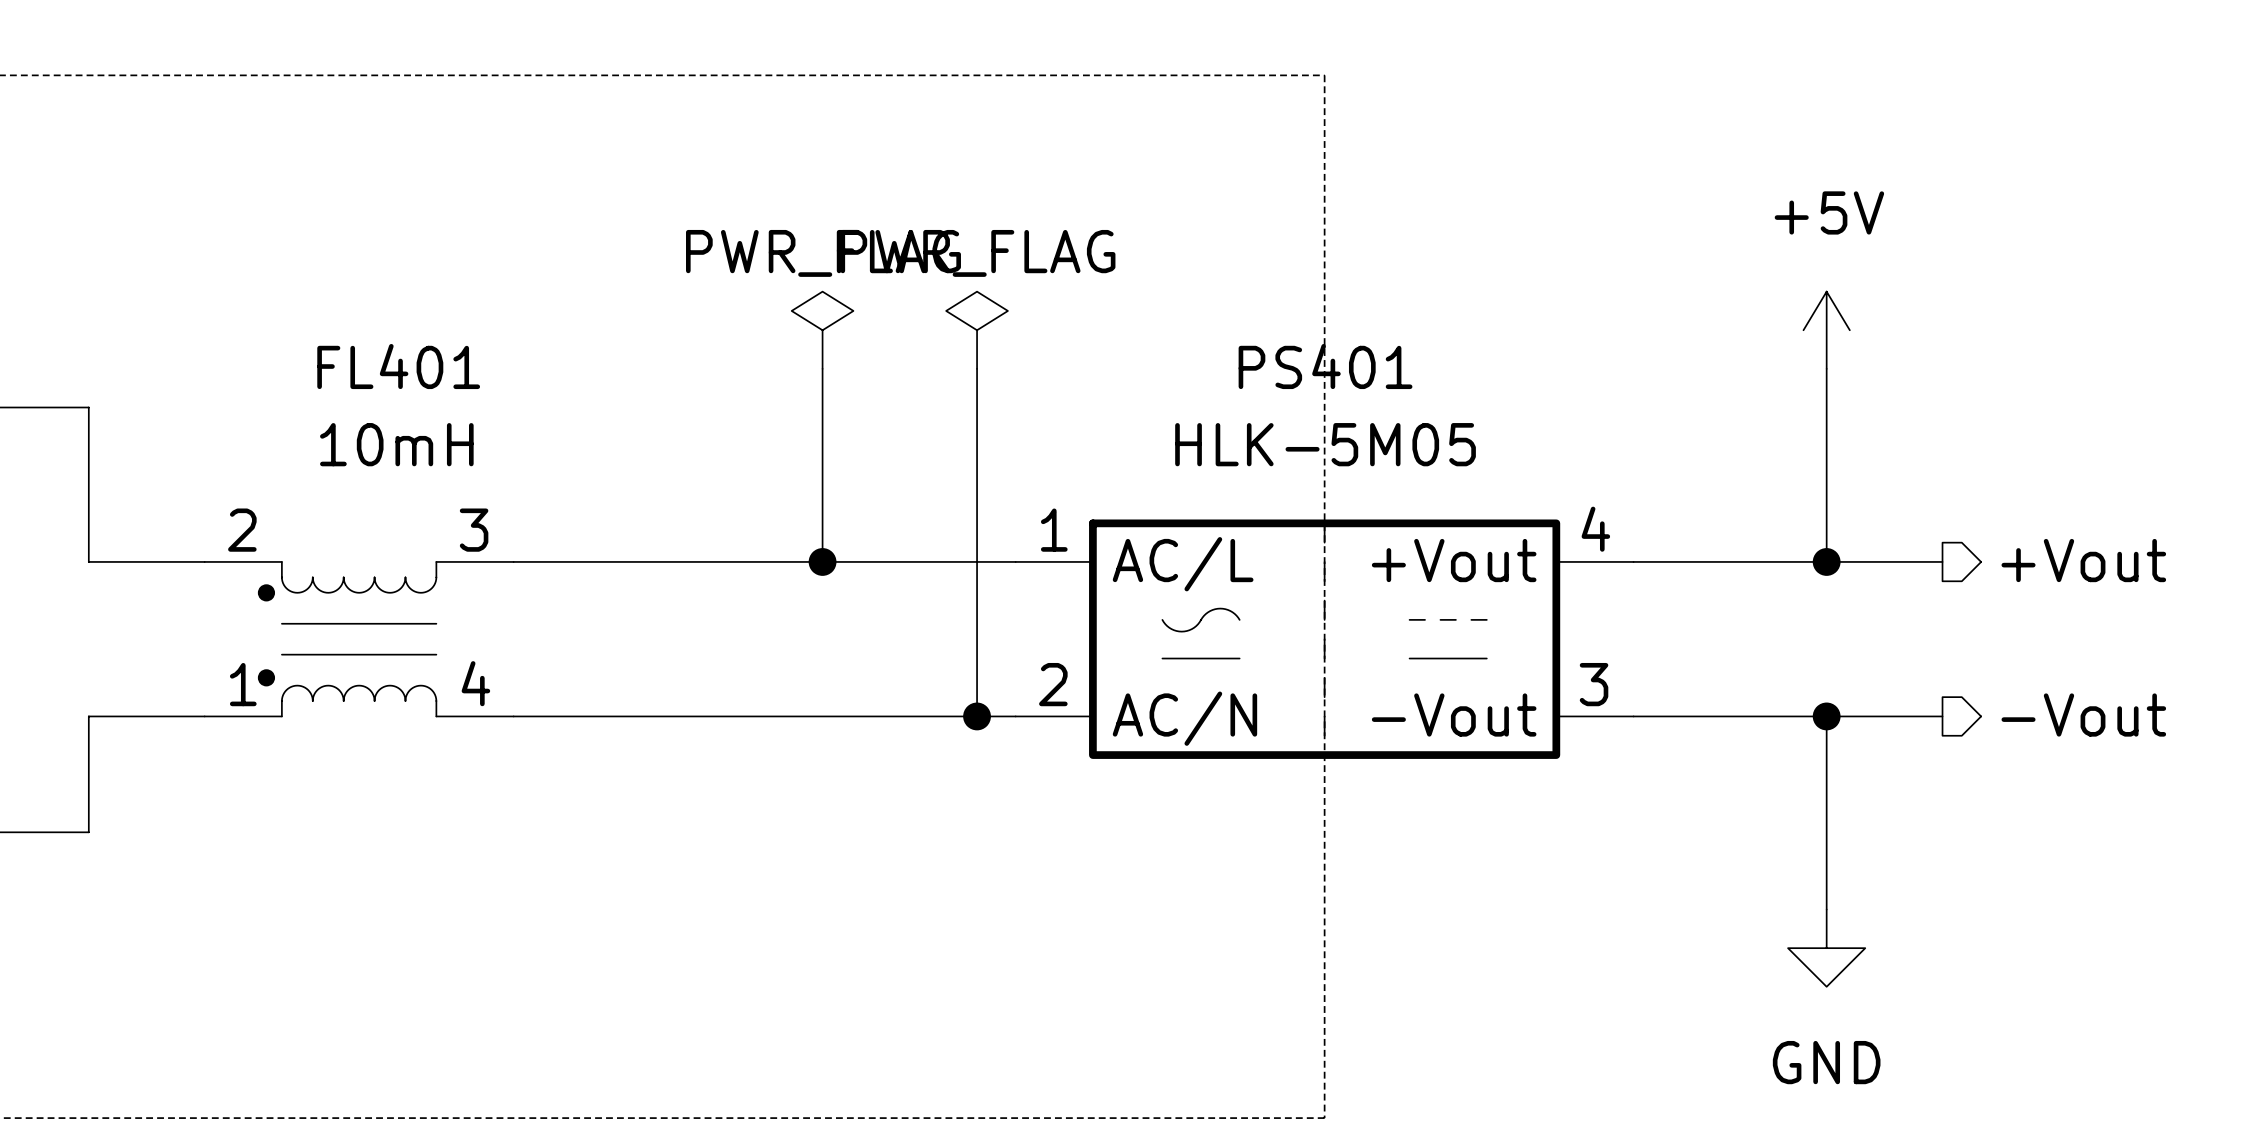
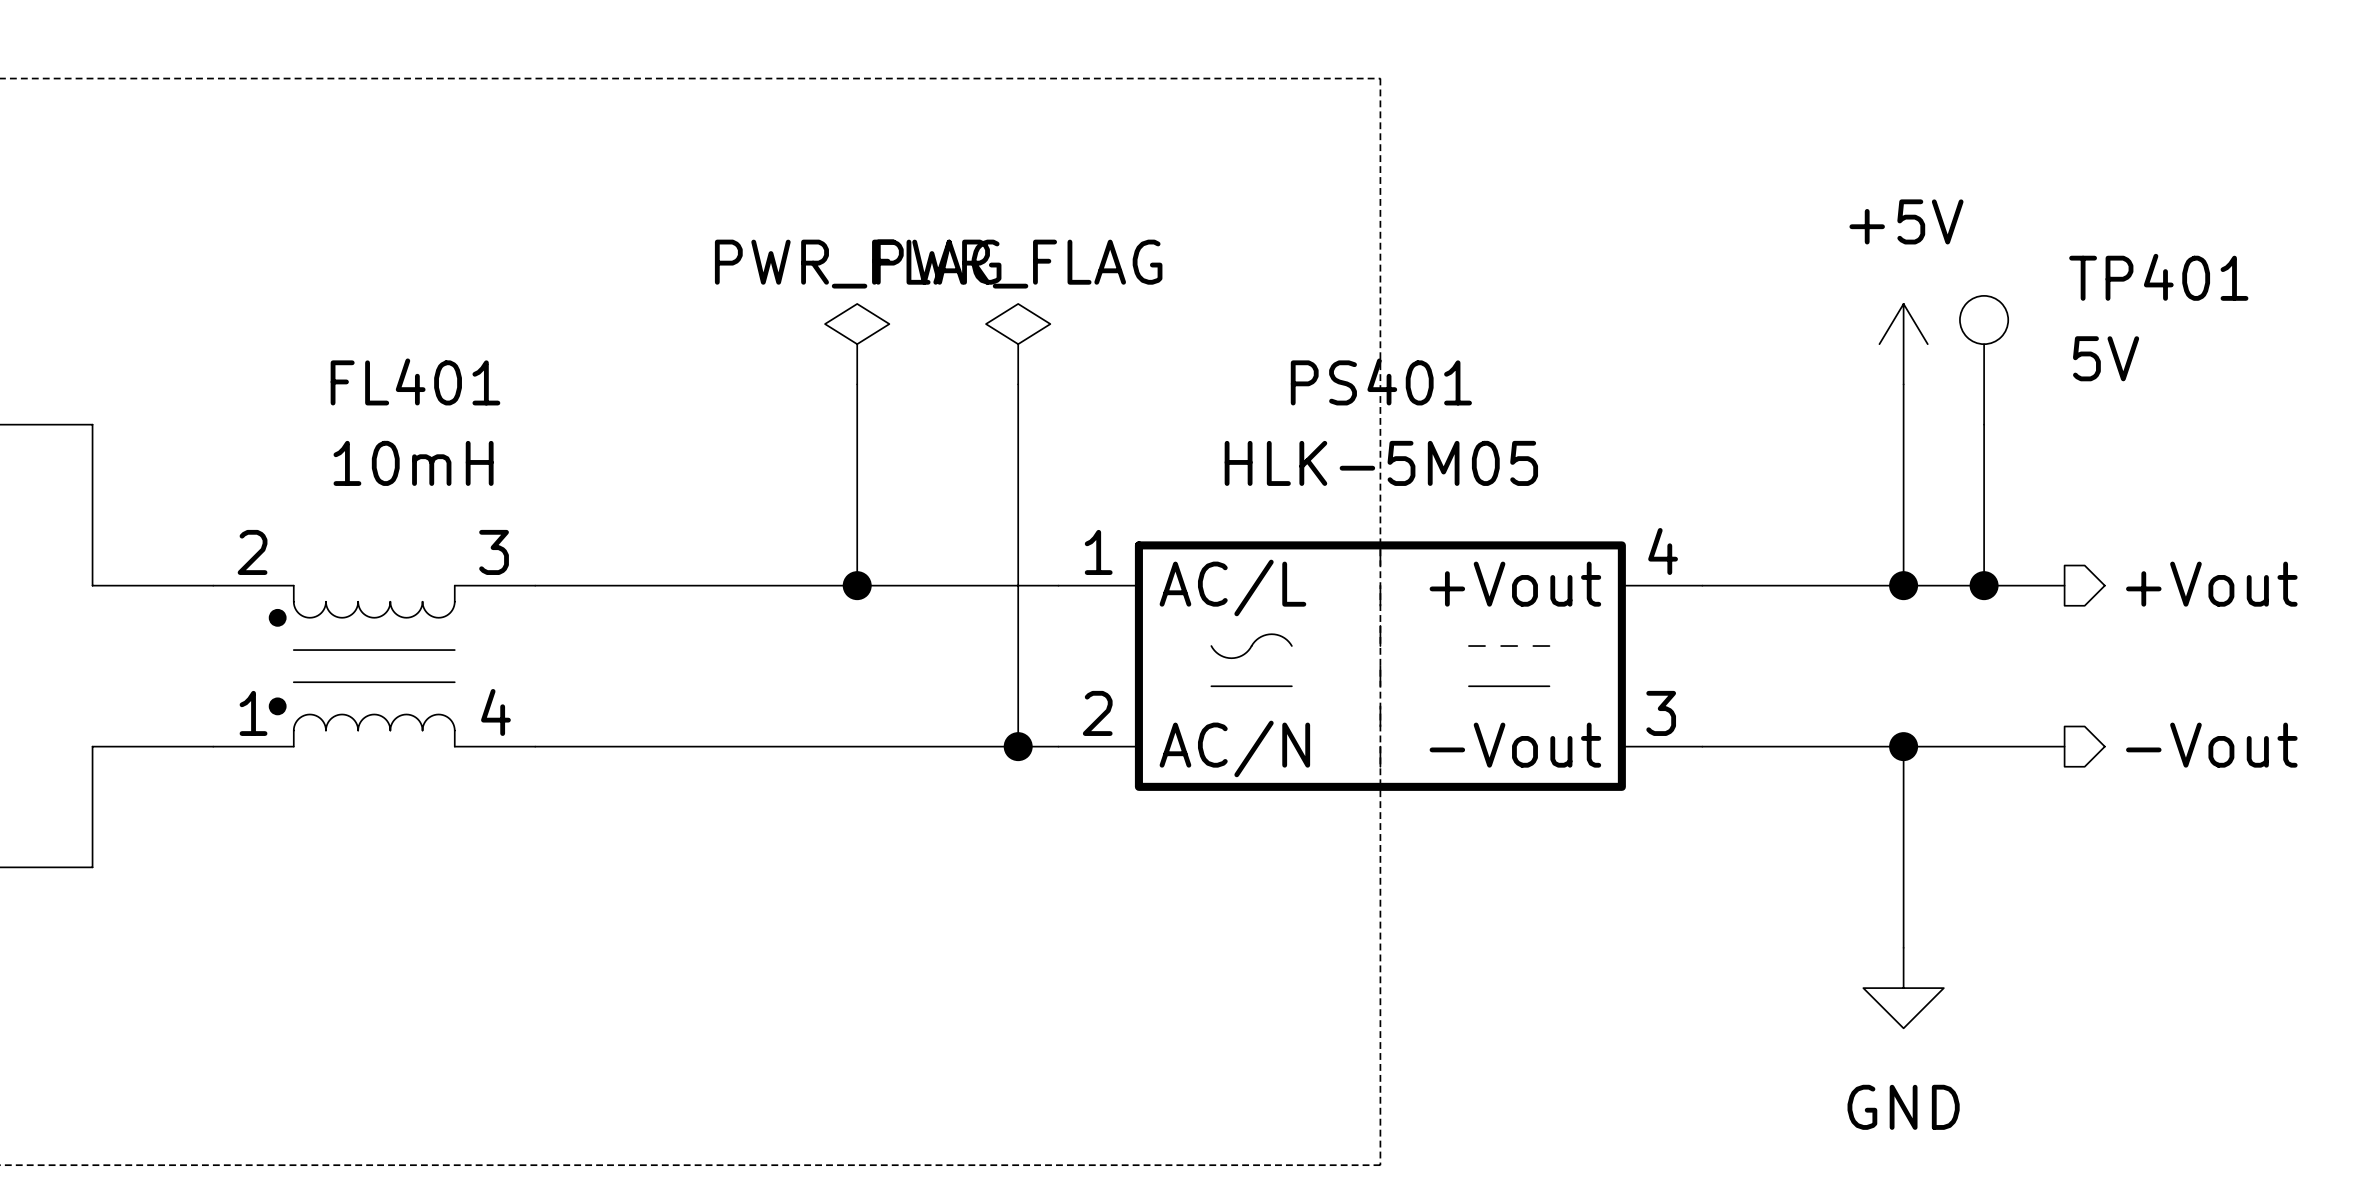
TP401: none -> 5V (1984, 360)
wire: none -> (1984, 424) (1984, 585)
hierarchical label position: +Vout (2083, 560) -> +Vout (2211, 584)
junction: none -> (1984, 585)
wire: none -> (2024, 585) (2064, 585)
hierarchical label position: -Vout (2083, 715) -> -Vout (2211, 745)
wire: none -> (2024, 746) (2064, 746)

